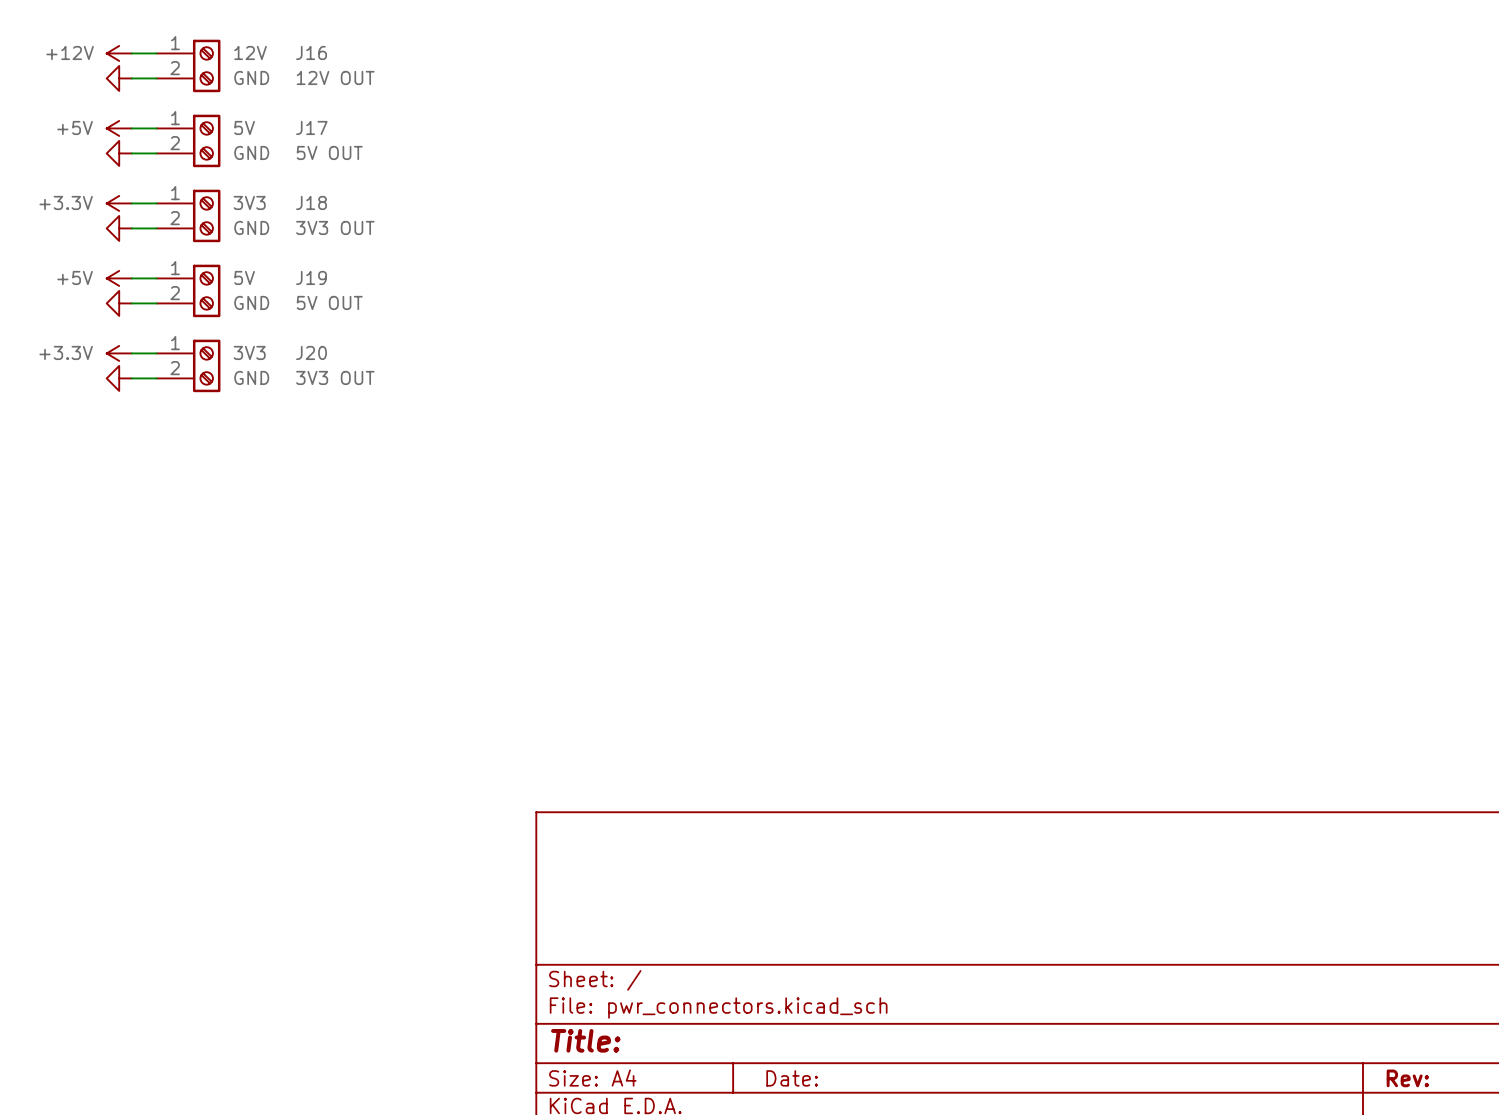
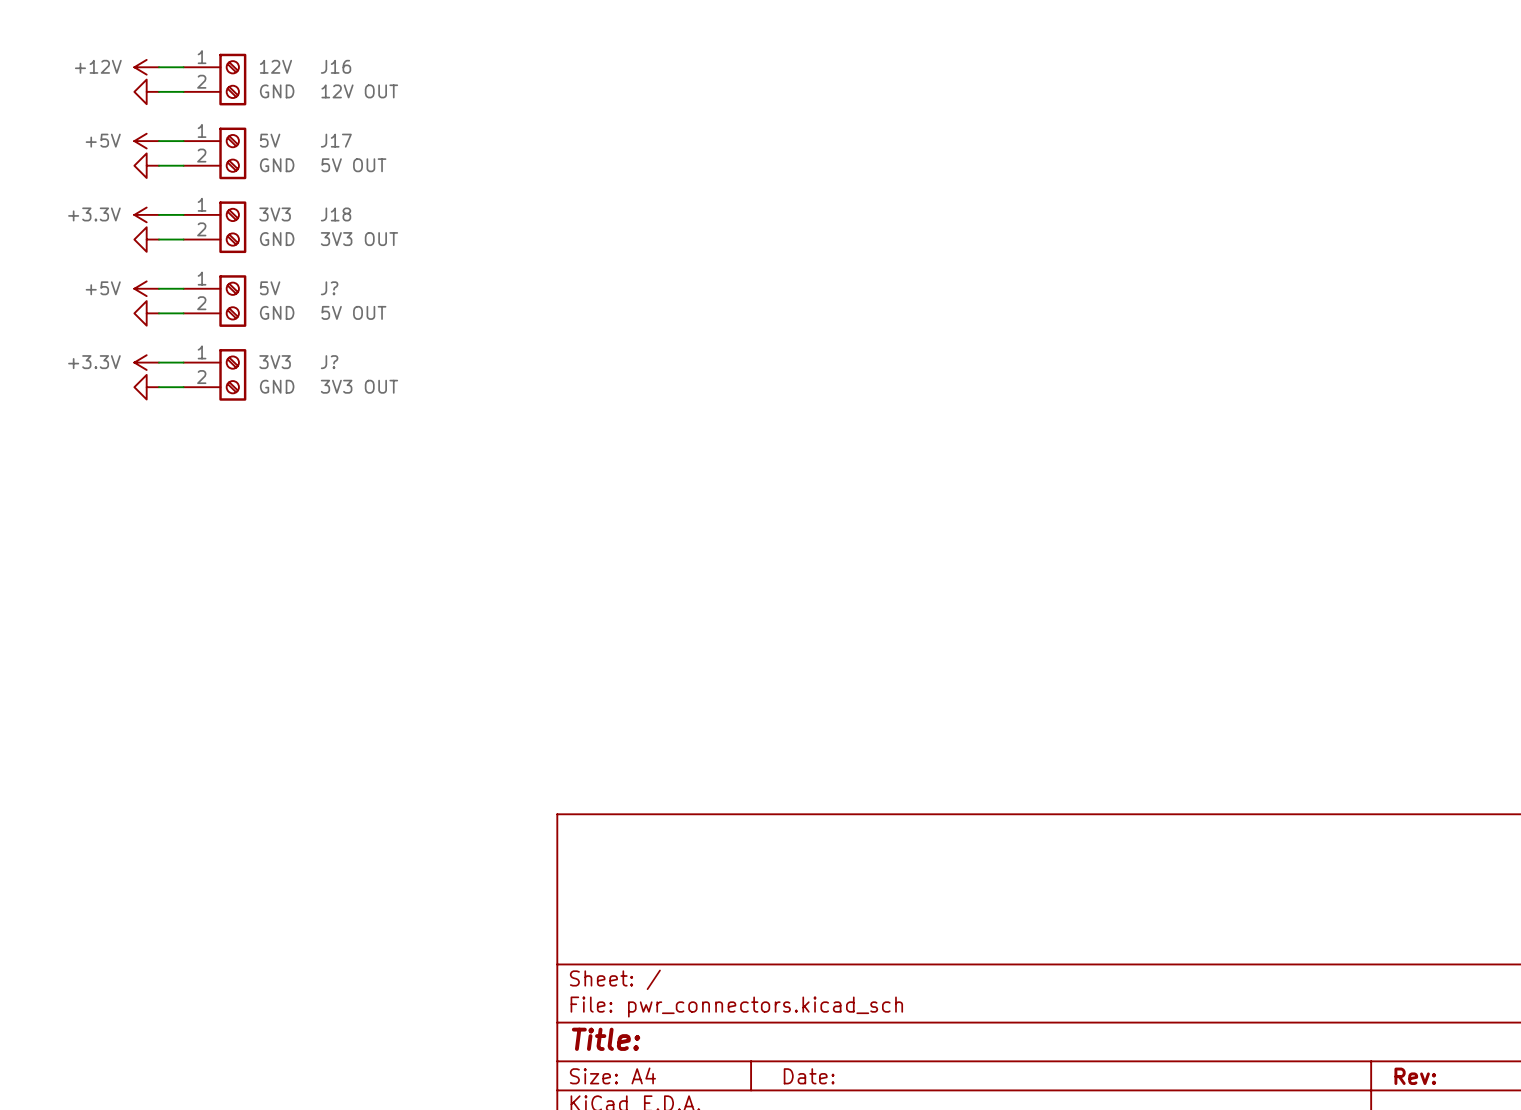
J19 name: J19 (311, 277) -> J? (329, 288)
J20 name: J20 (311, 352) -> J? (329, 362)

